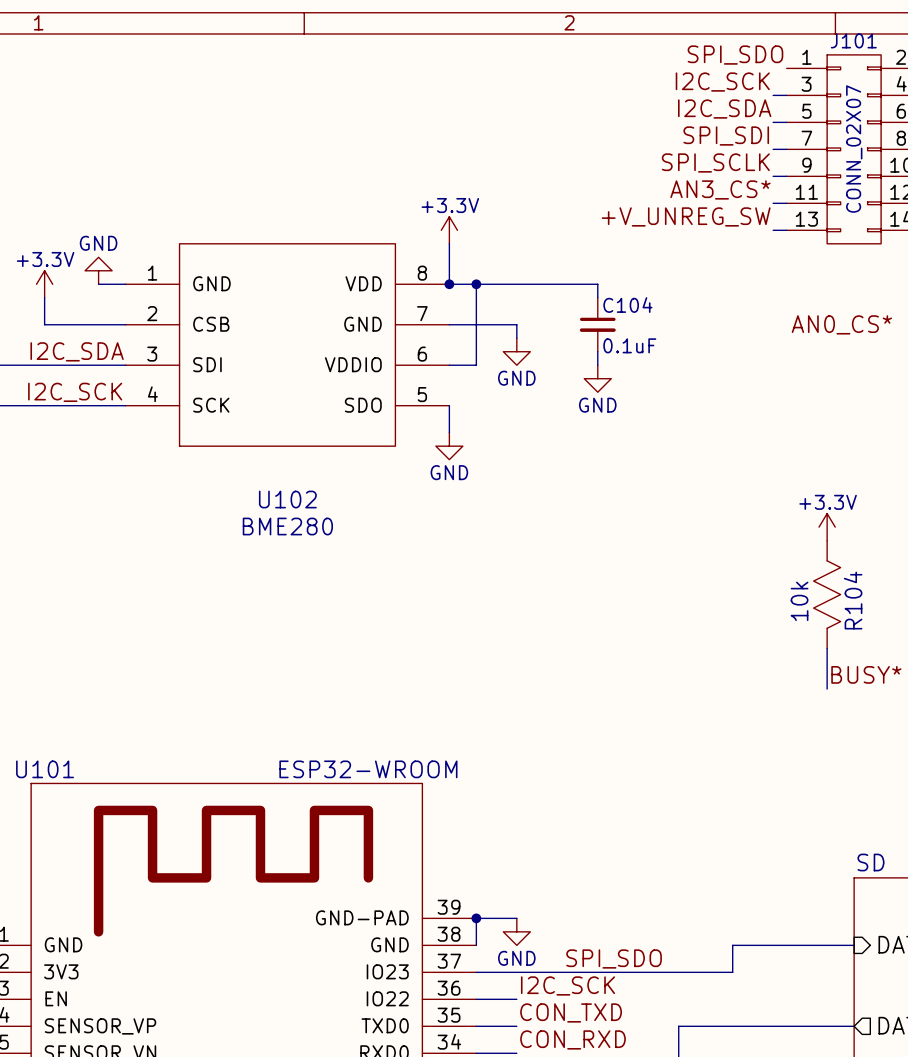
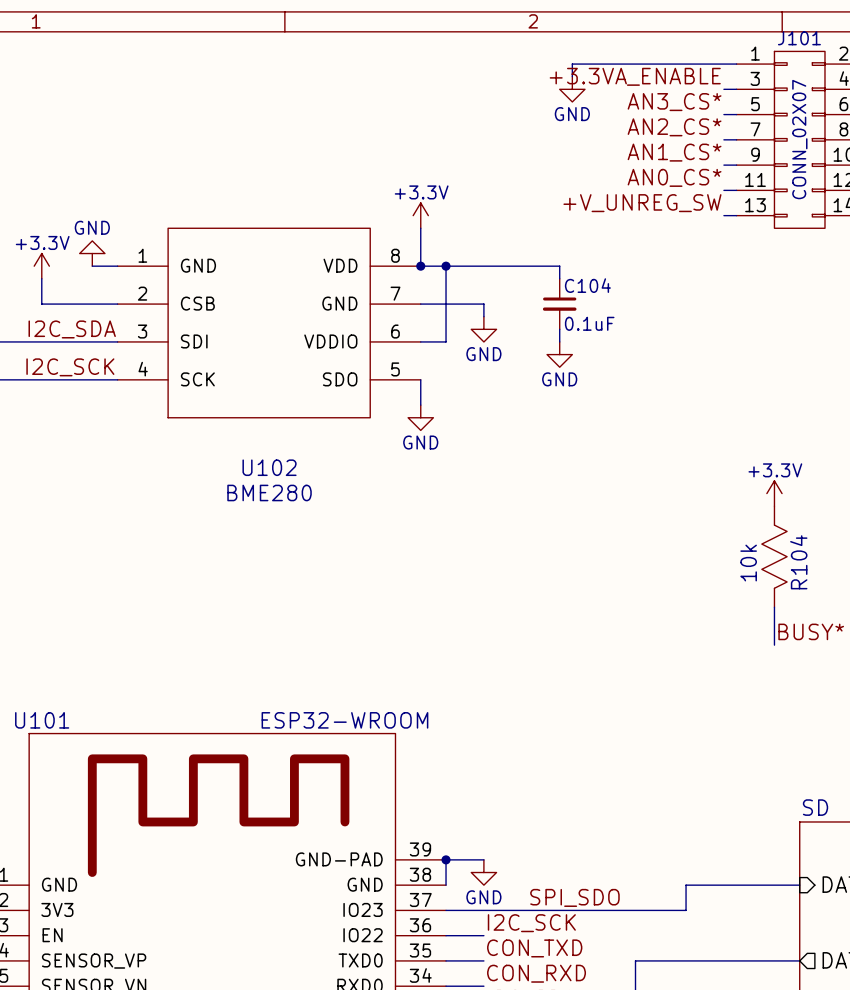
label: SPI_SDO (735, 55) -> none
wire: none -> (736, 64) (572, 64) (572, 76)
label: I2C_SCK (722, 82) -> +3.3VA_ENABLE (635, 76)
power symbol: none -> GND (572, 89)
label: I2C_SDA (724, 109) -> AN3_CS* (674, 102)
label: SPI_SDI (726, 136) -> AN2_CS* (674, 127)
label: SPI_SCLK (715, 162) -> AN1_CS* (674, 152)
label: AN3_CS* (720, 189) -> AN0_CS* (674, 177)
label: AN0_CS* (841, 324) -> none

